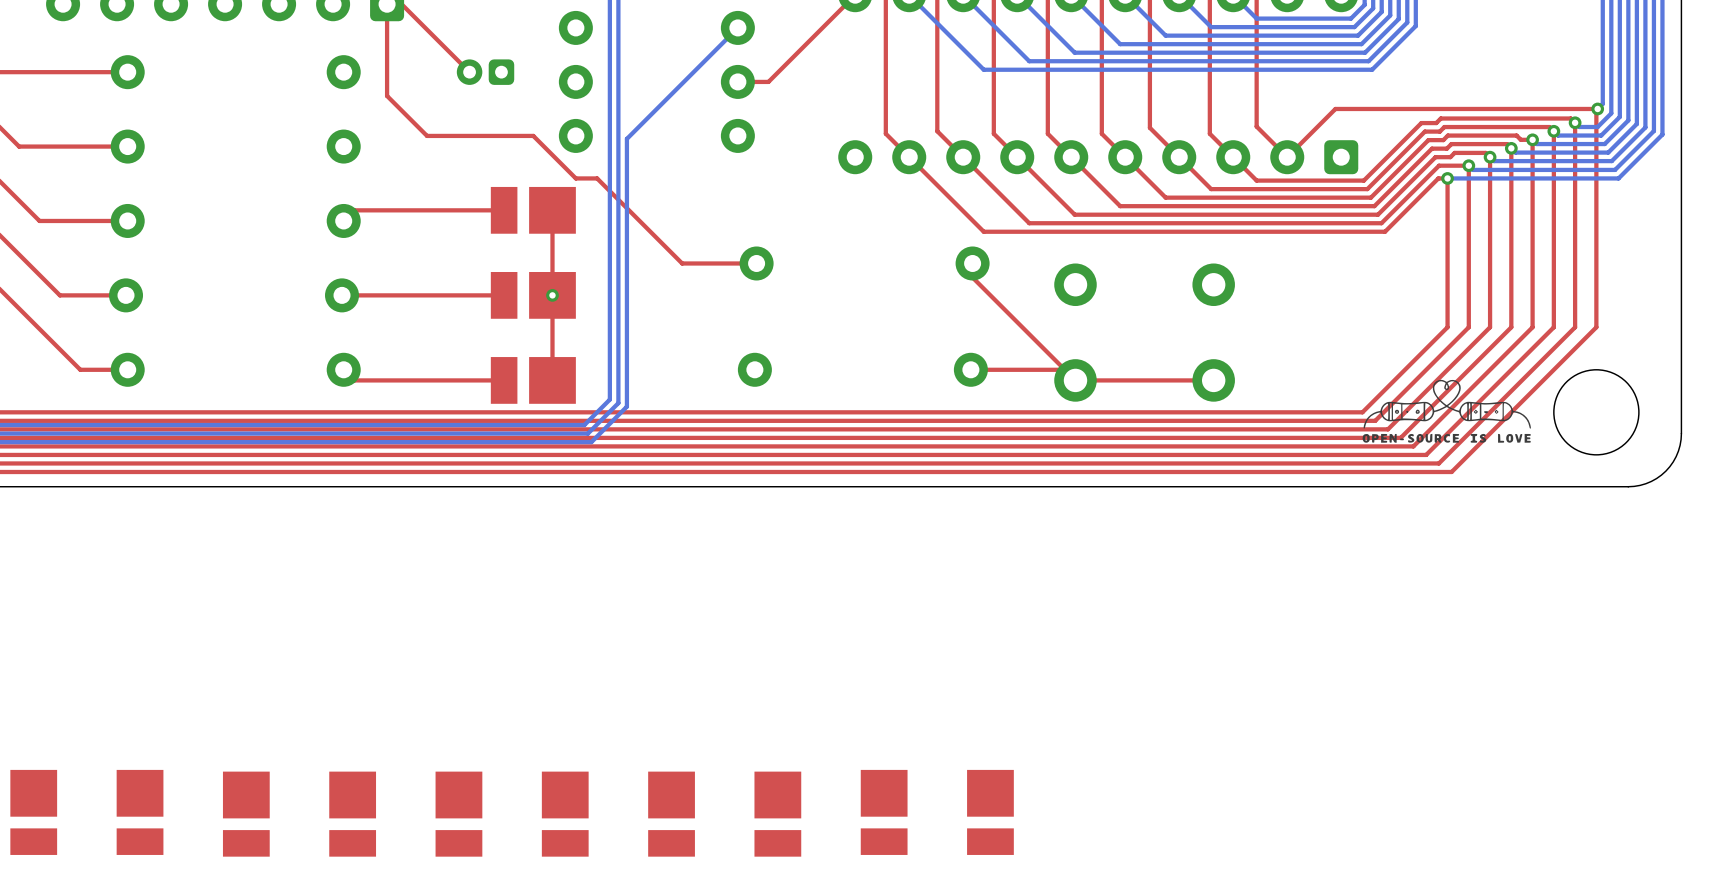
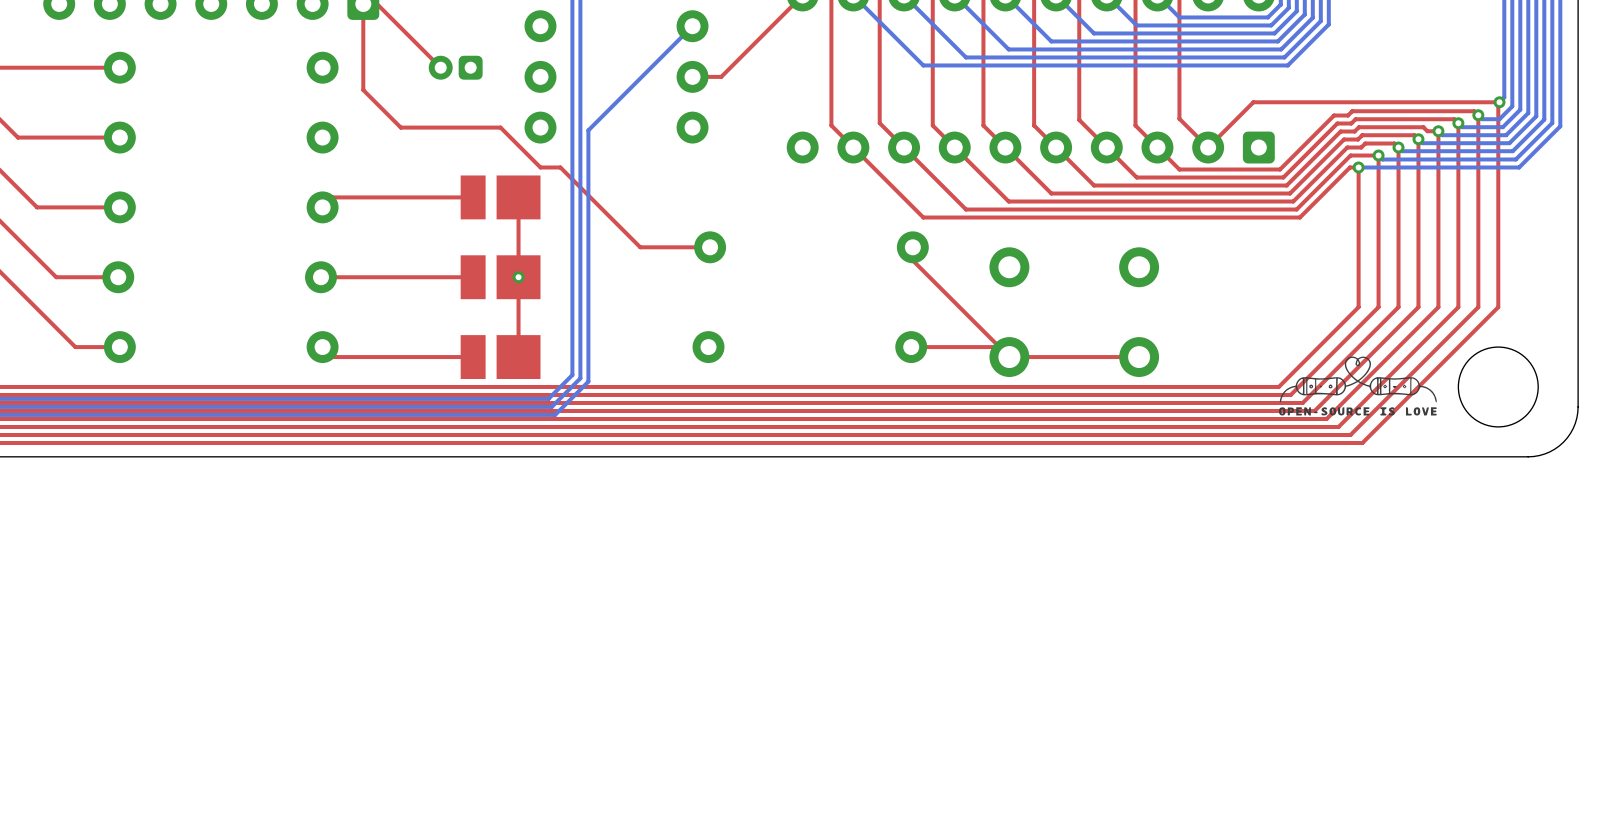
part: (33, 812) -> none
part: (140, 812) -> none
part: (884, 812) -> none
part: (990, 812) -> none
part: (246, 814) -> none
part: (352, 814) -> none
part: (458, 814) -> none
part: (565, 814) -> none
part: (671, 814) -> none
part: (777, 814) -> none

